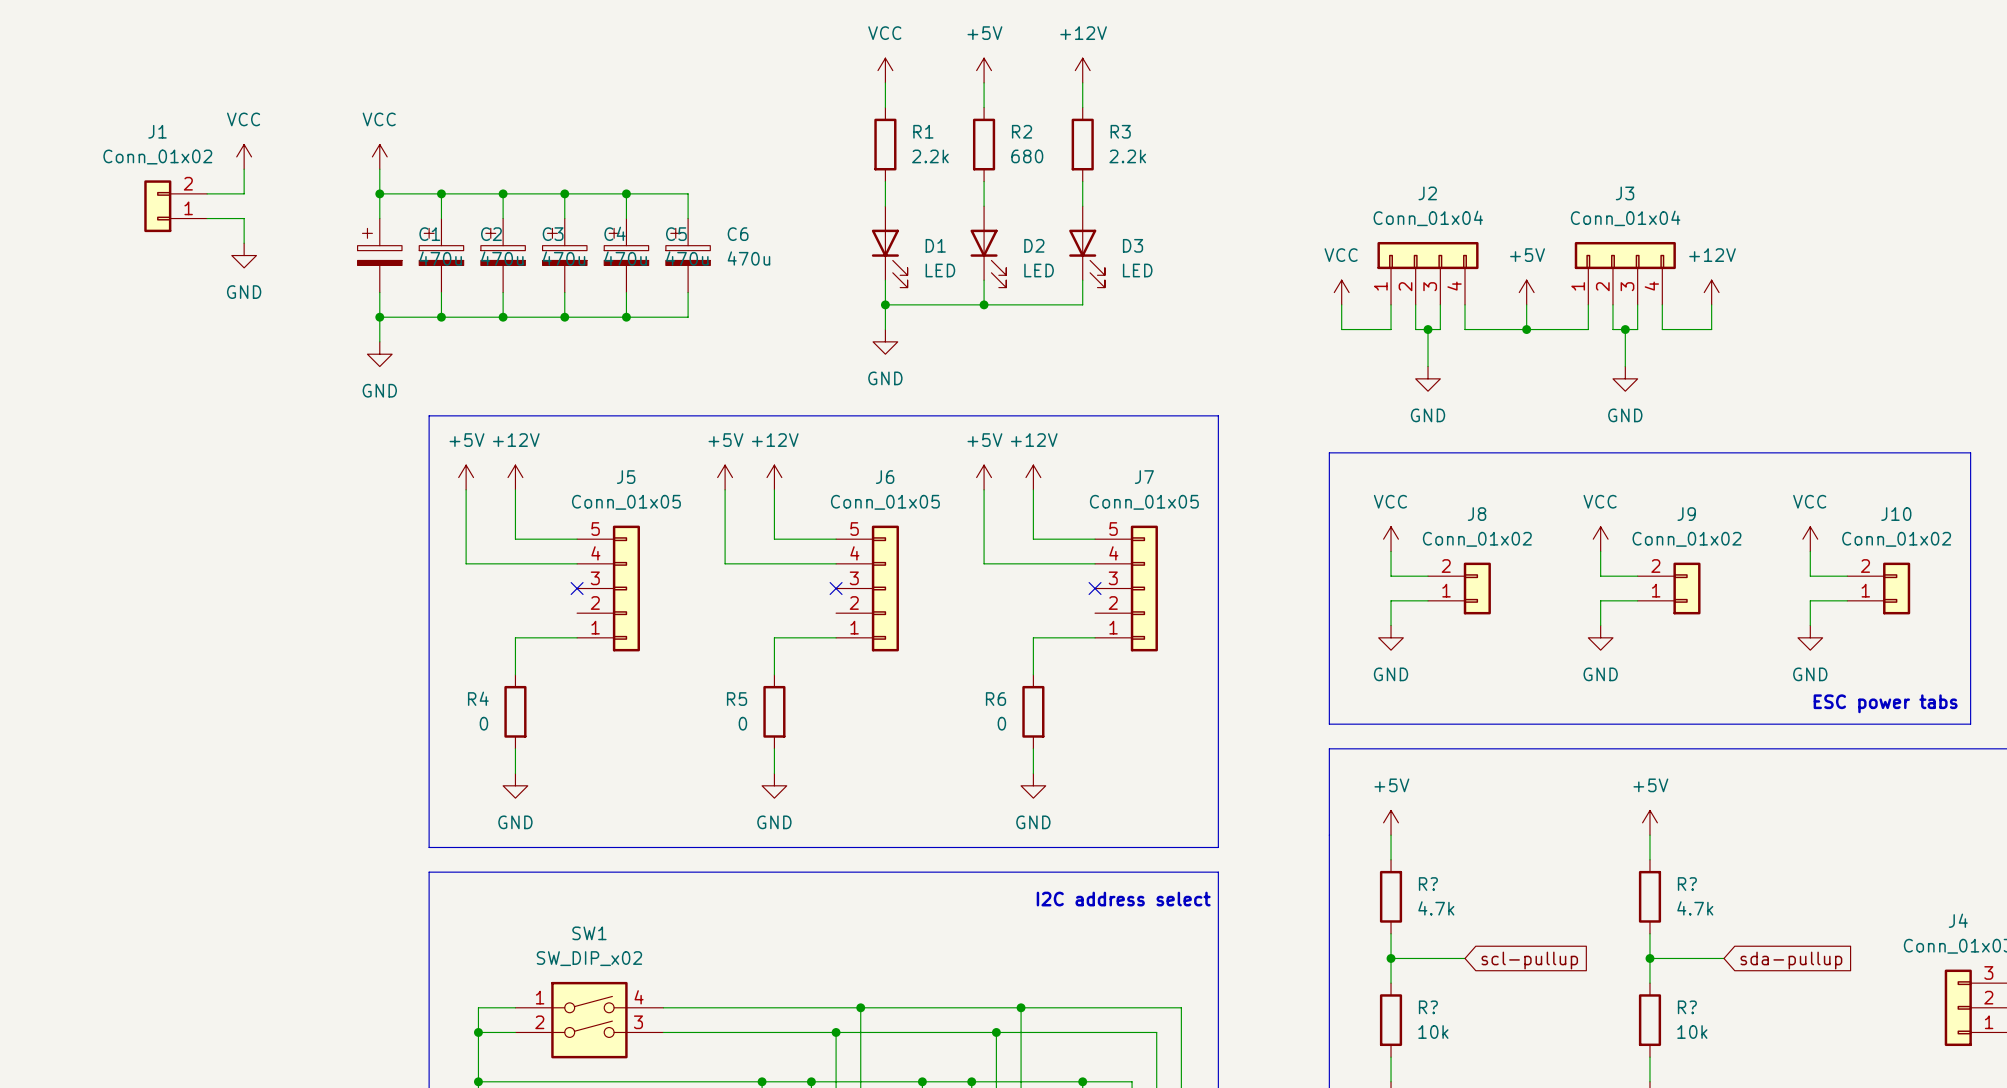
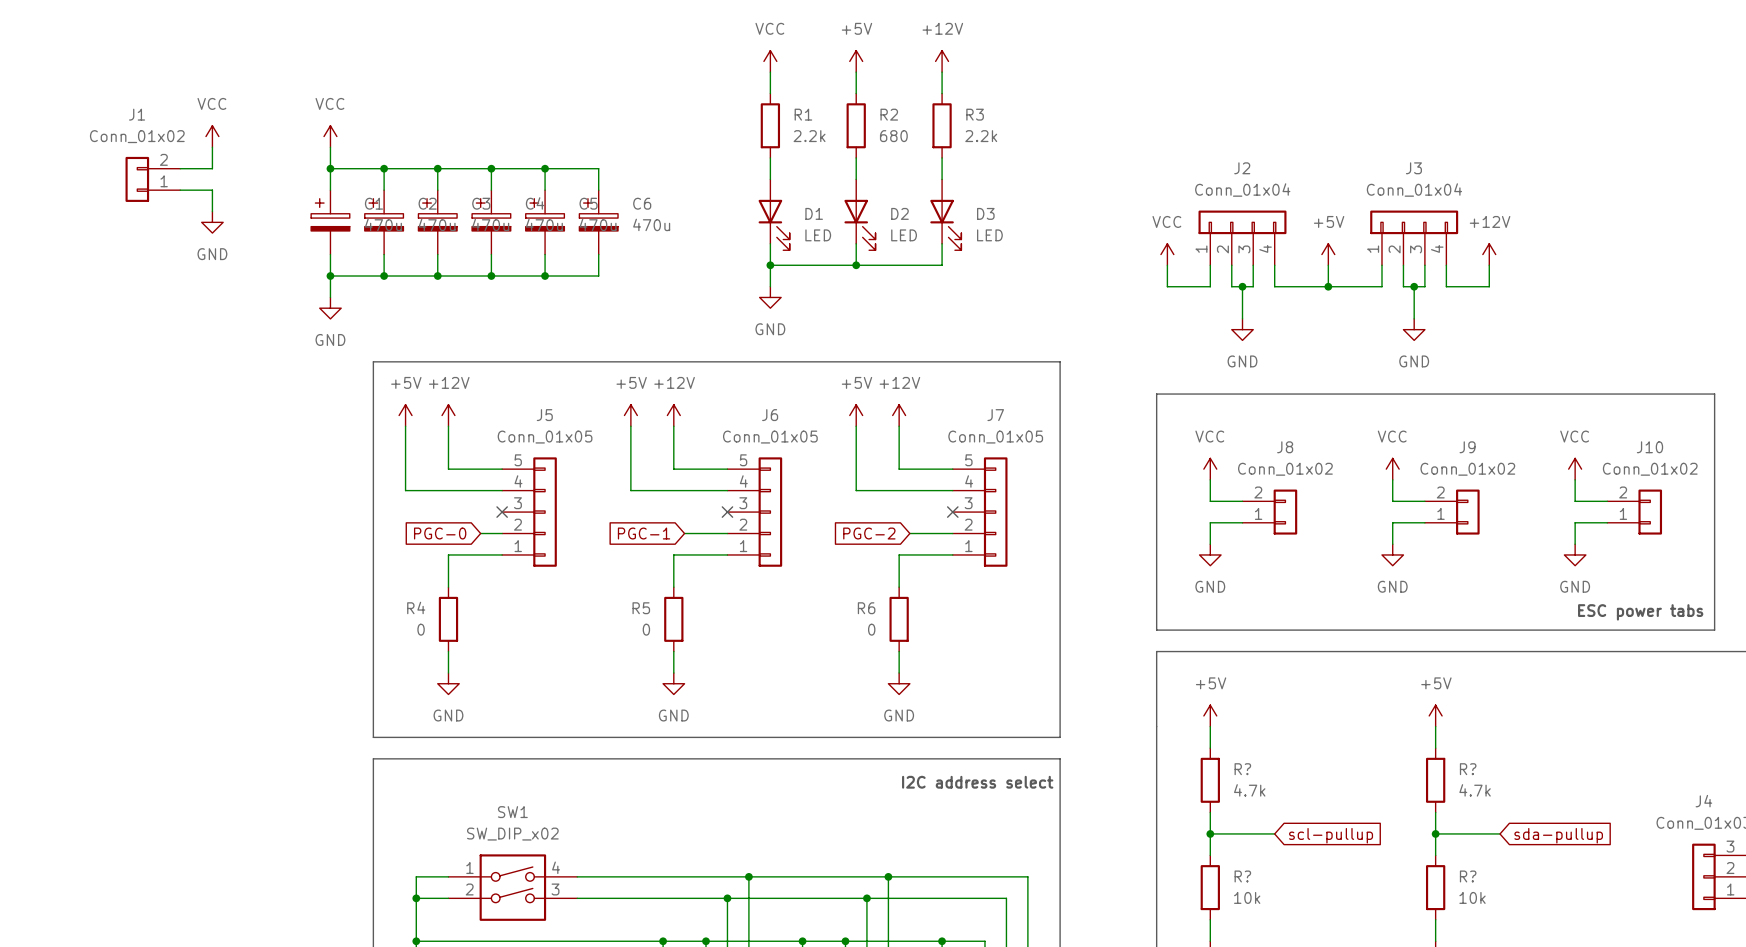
global label: none -> PGC-0 (440, 533)
wire: none -> (480, 533) (502, 533)
global label: none -> PGC-1 (644, 533)
wire: none -> (684, 533) (727, 533)
global label: none -> PGC-2 (869, 533)
wire: none -> (909, 533) (952, 533)

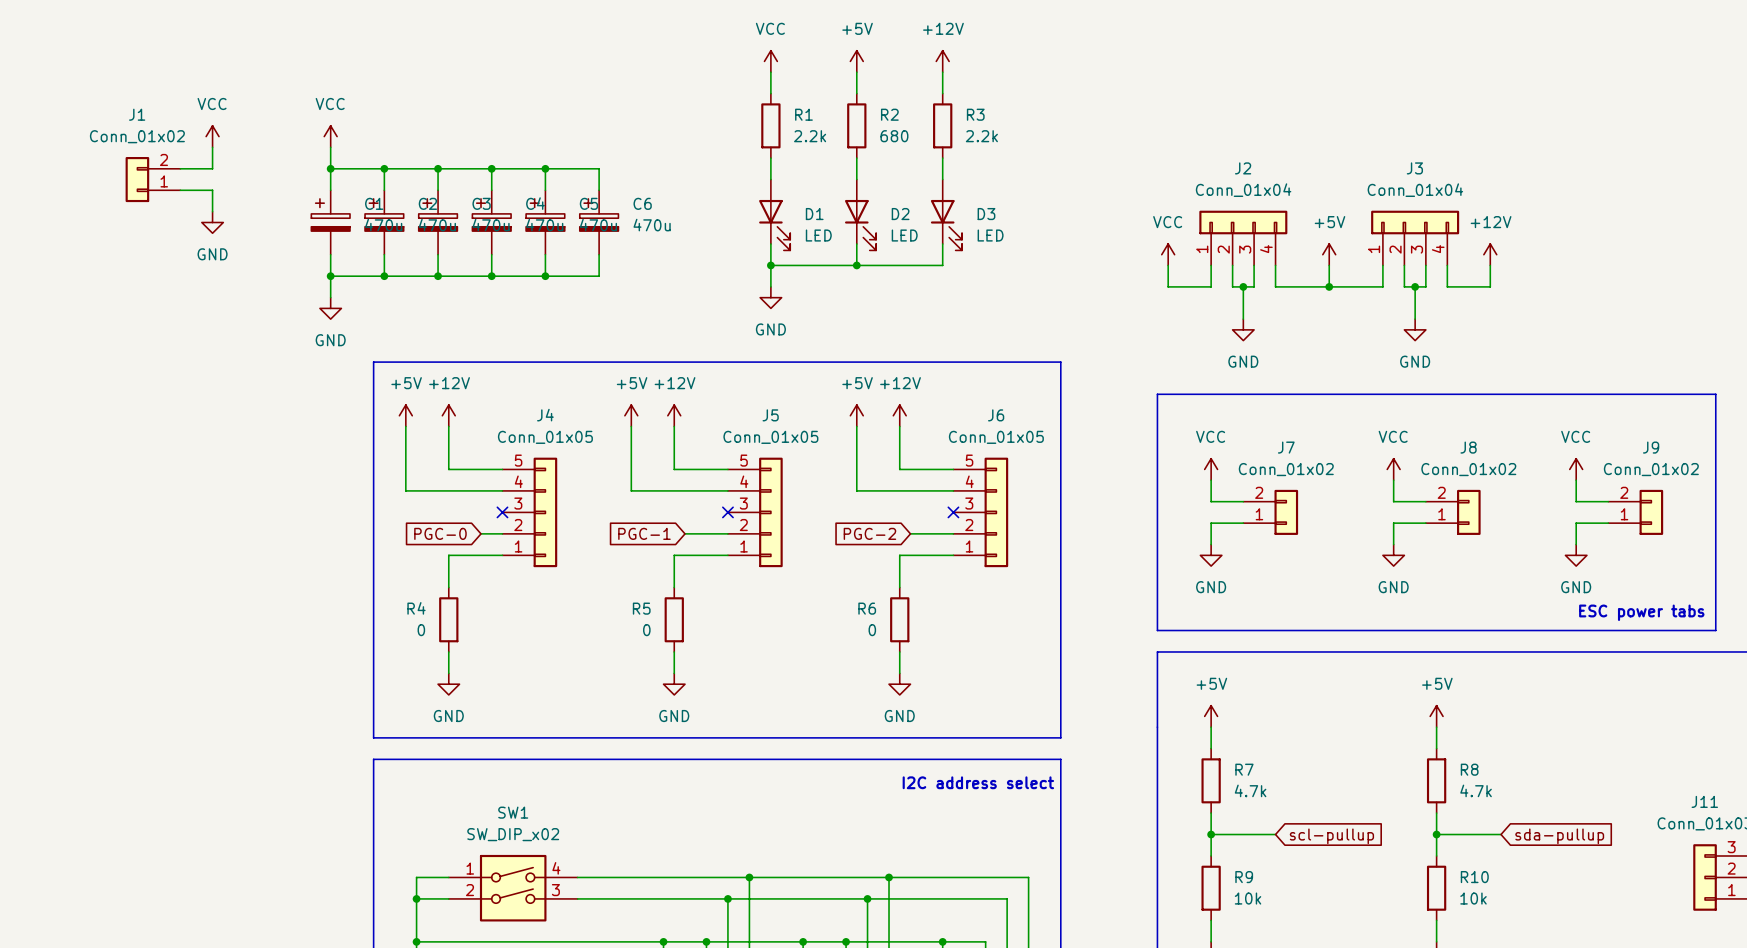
J5 name: J5 (544, 415) -> J4 (545, 415)
J6 name: J6 (770, 415) -> J5 (770, 415)
J7 name: J7 (995, 415) -> J6 (996, 415)
J8 name: J8 (1285, 447) -> J7 (1286, 447)
J9 name: J9 (1467, 447) -> J8 (1468, 447)
J10 name: J10 (1649, 447) -> J9 (1651, 447)
R? name: R? (1242, 769) -> R7 (1244, 769)
R? name: R? (1468, 769) -> R8 (1469, 769)
J4 name: J4 (1703, 801) -> J11 (1704, 801)
R? name: R? (1242, 876) -> R9 (1244, 877)
R? name: R? (1468, 876) -> R10 (1474, 877)

